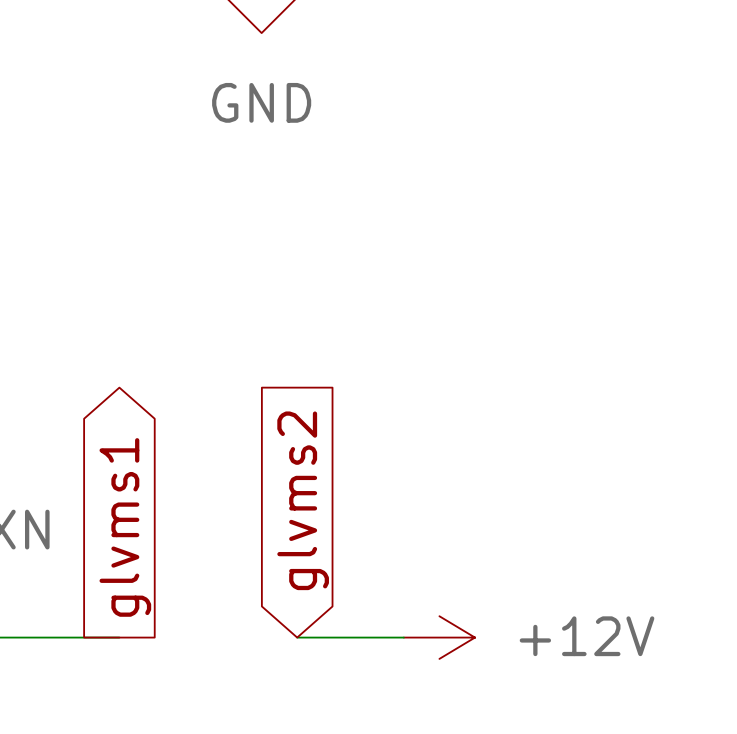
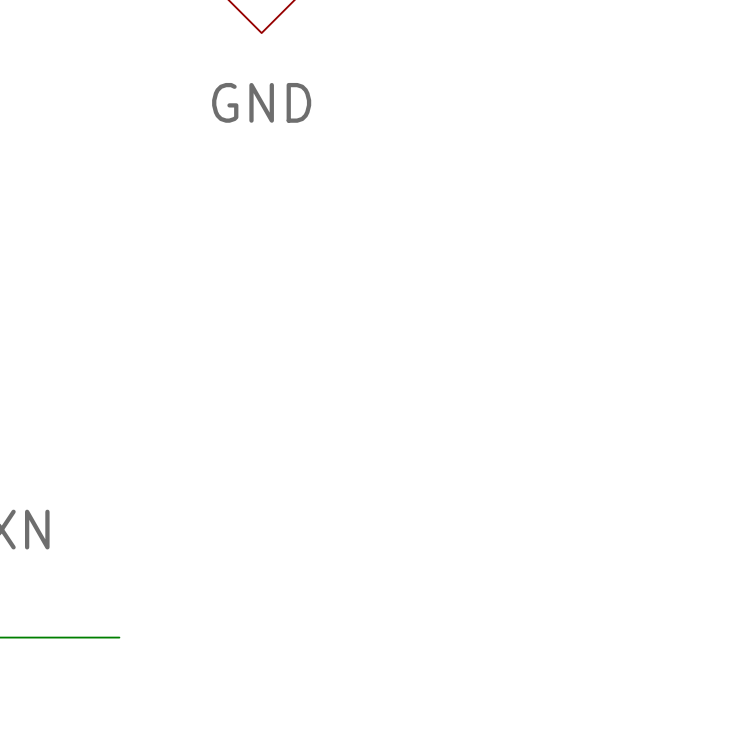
global label: glvms2 (303, 500) -> none
global label: glvms1 (125, 527) -> none
wire: (297, 637) (403, 637) -> none
power symbol: +12V (439, 637) -> none

